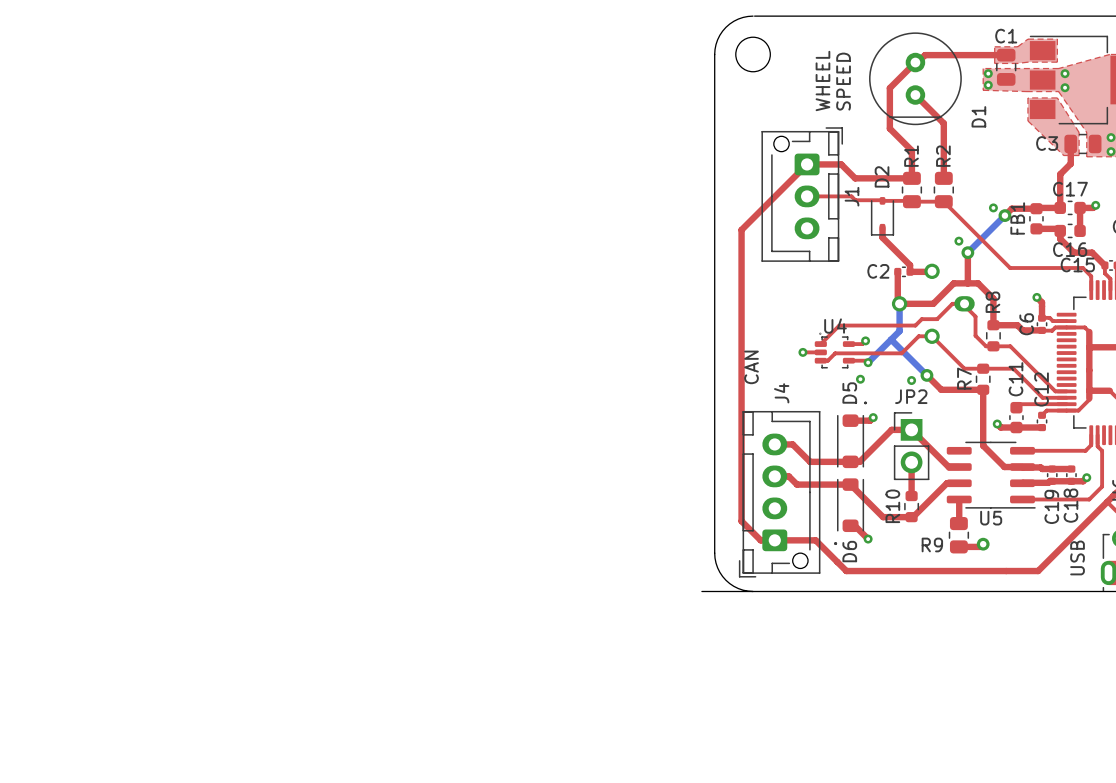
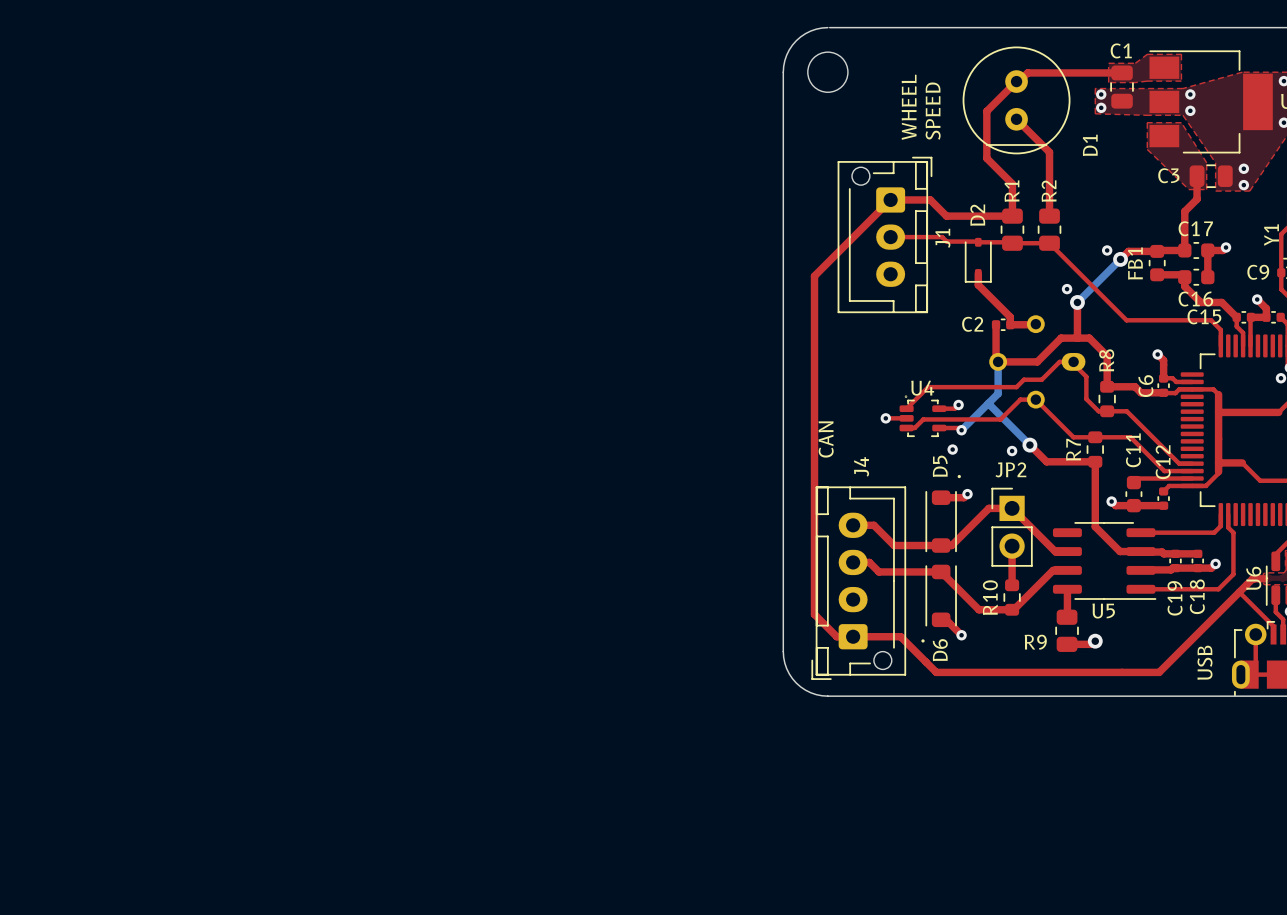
board edge: (701, 591) (753, 591) -> none

